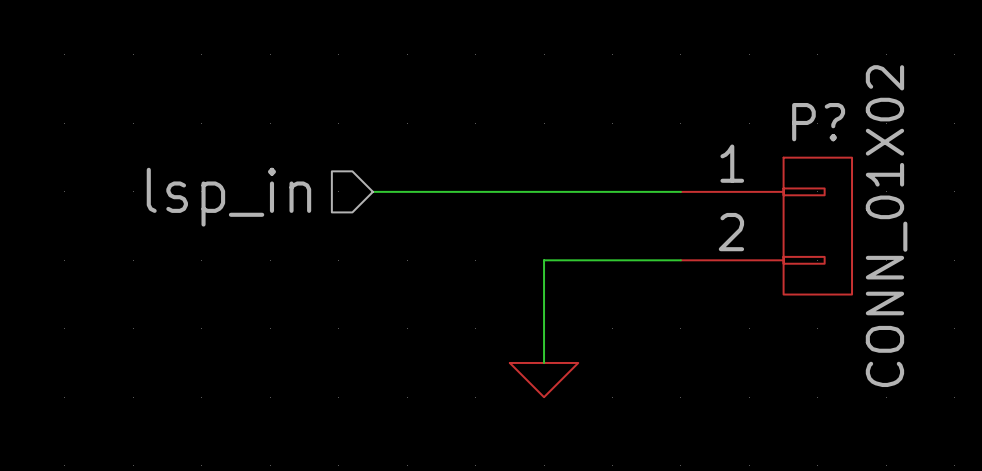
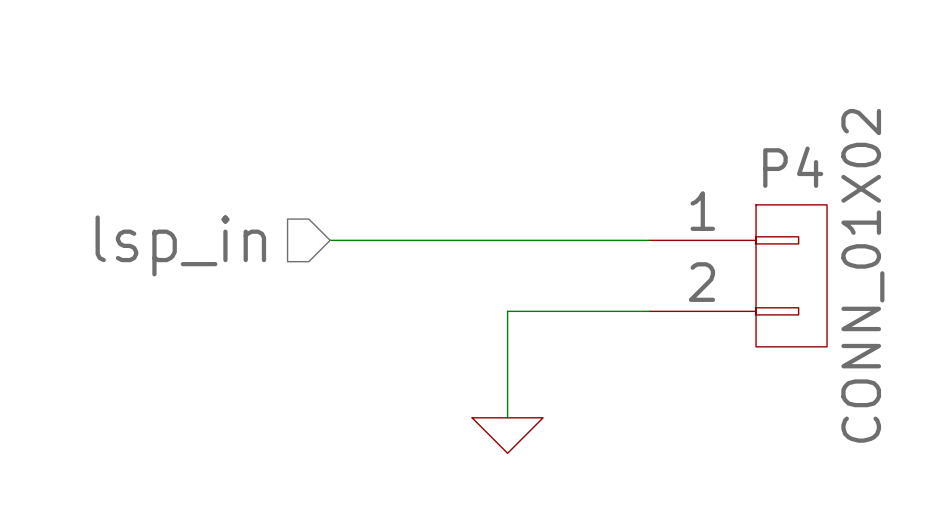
P? name: P? (818, 122) -> P4 (793, 167)

